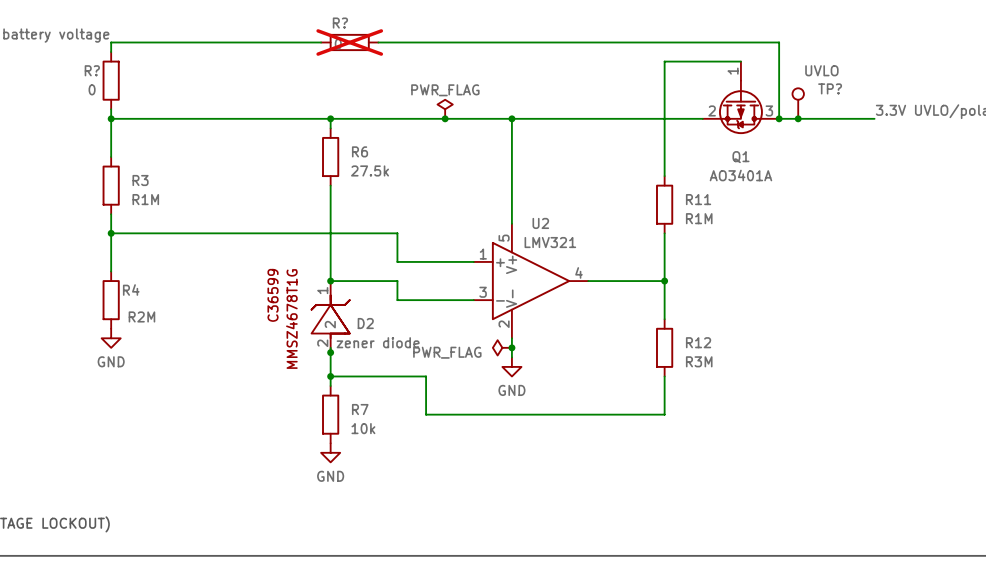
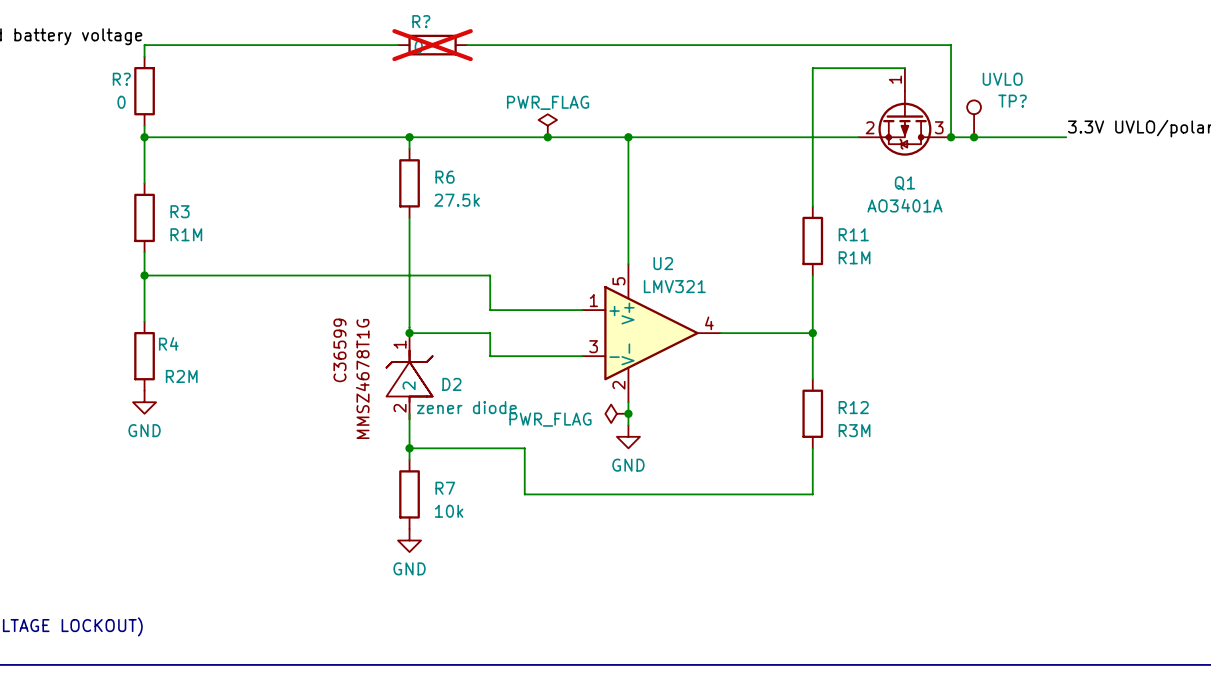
junction: (330, 352) -> none

